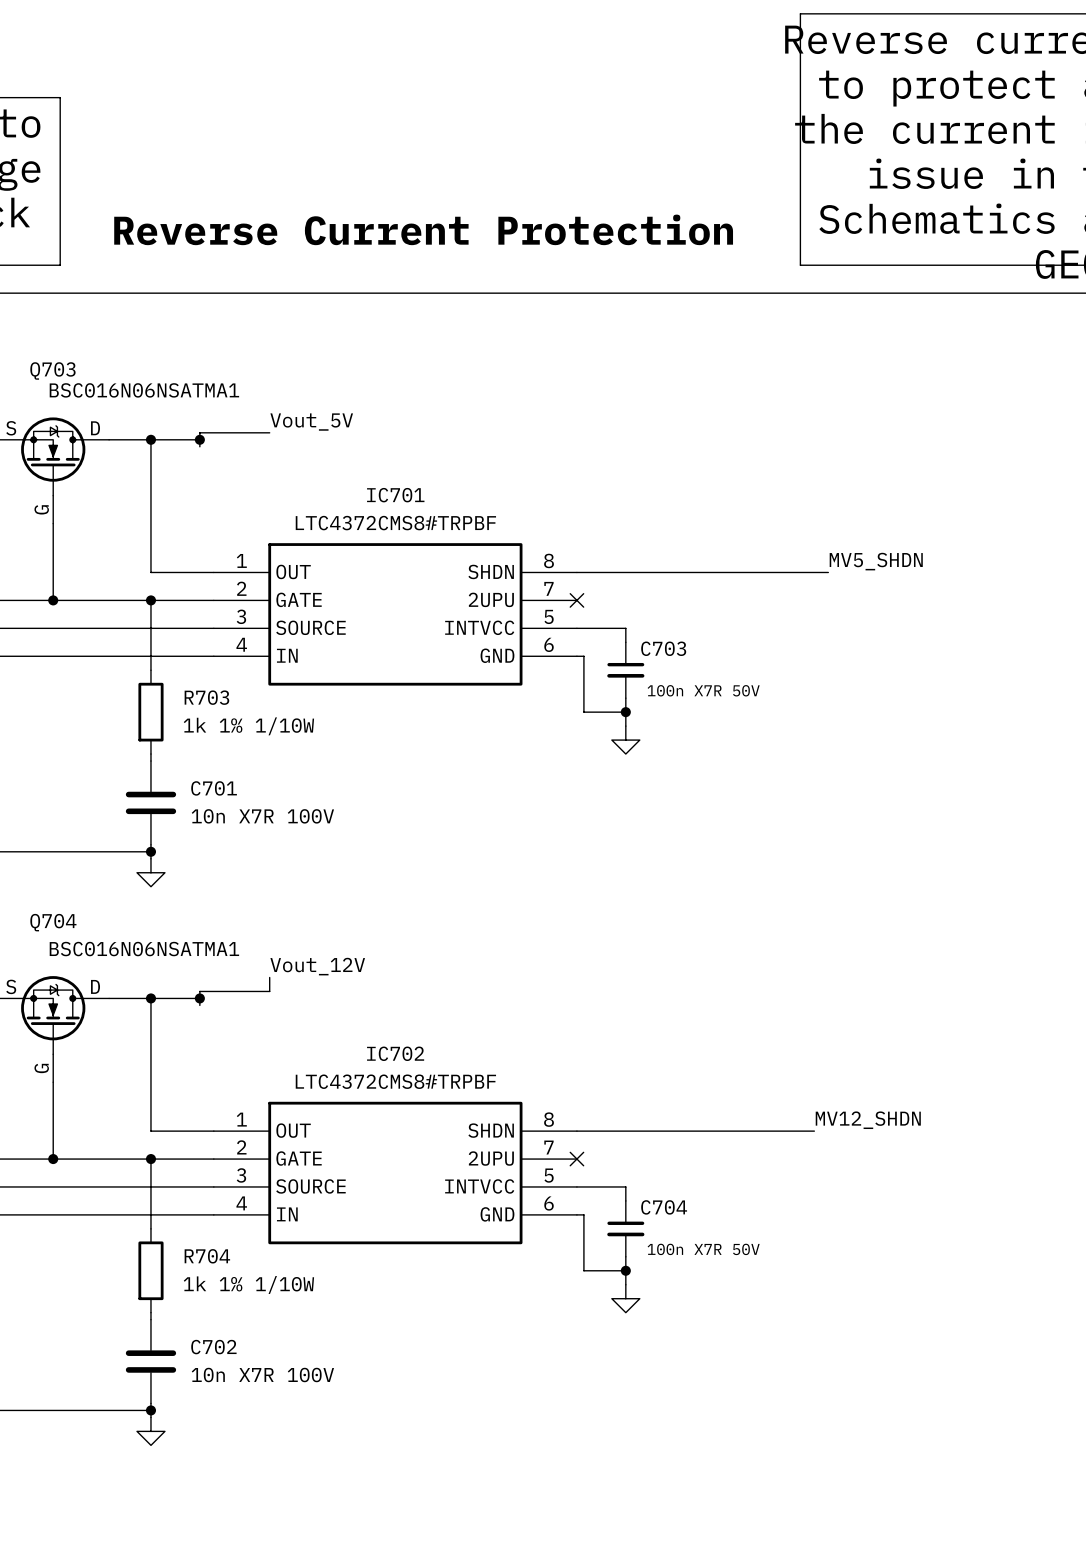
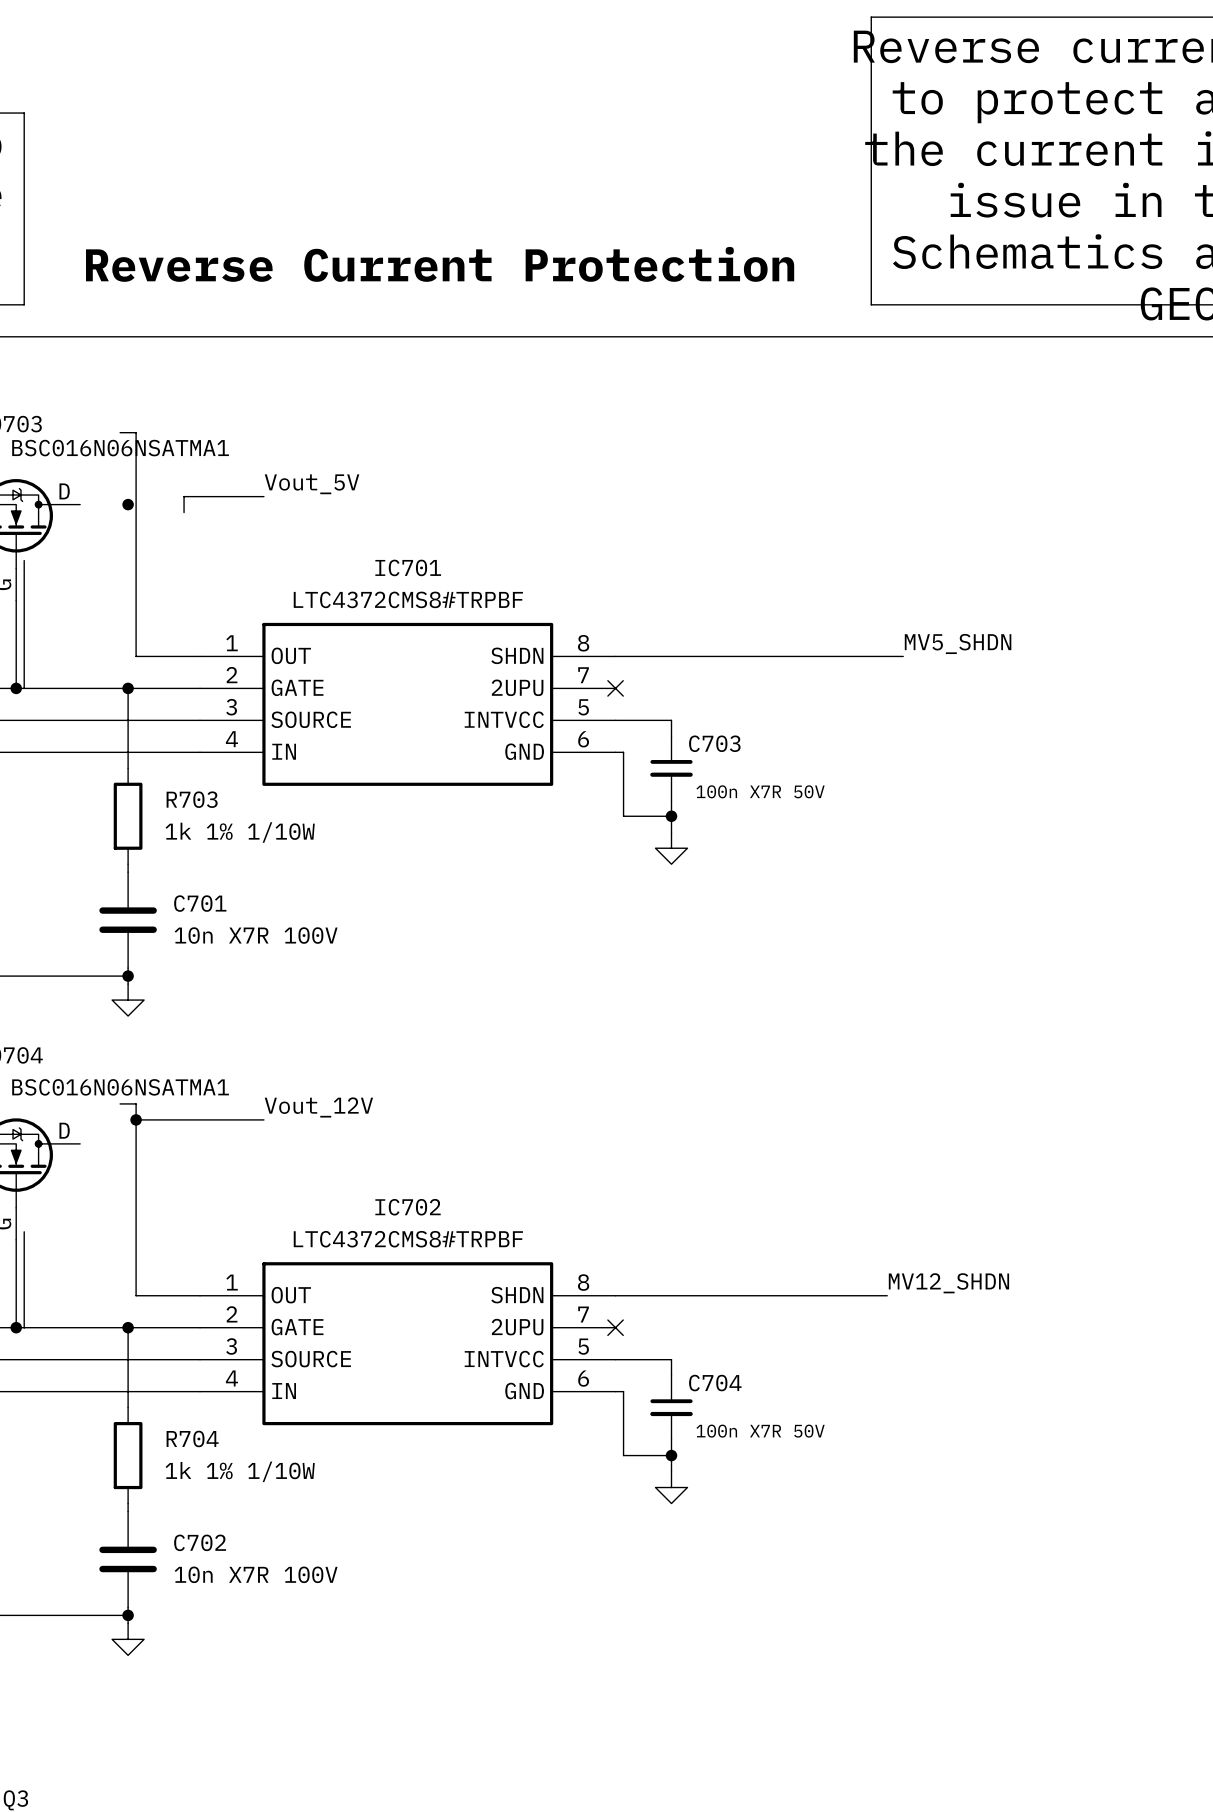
wire: (109, 439) (199, 439) -> none
wire: (150, 439) (150, 572) (157, 572) -> (120, 432) (136, 432) (136, 656)
junction: (199, 439) -> none
wire: none -> (24, 560) (24, 688)
wire: (269, 977) (269, 991) (199, 991) (199, 1005) -> (263, 1119) (136, 1119)
wire: (109, 998) (199, 998) -> none
wire: (150, 998) (150, 1131) (157, 1131) -> (120, 1103) (136, 1103) (136, 1295)
junction position: (150, 998) -> (136, 1119)
junction: (199, 998) -> none
wire: none -> (24, 1231) (24, 1327)

